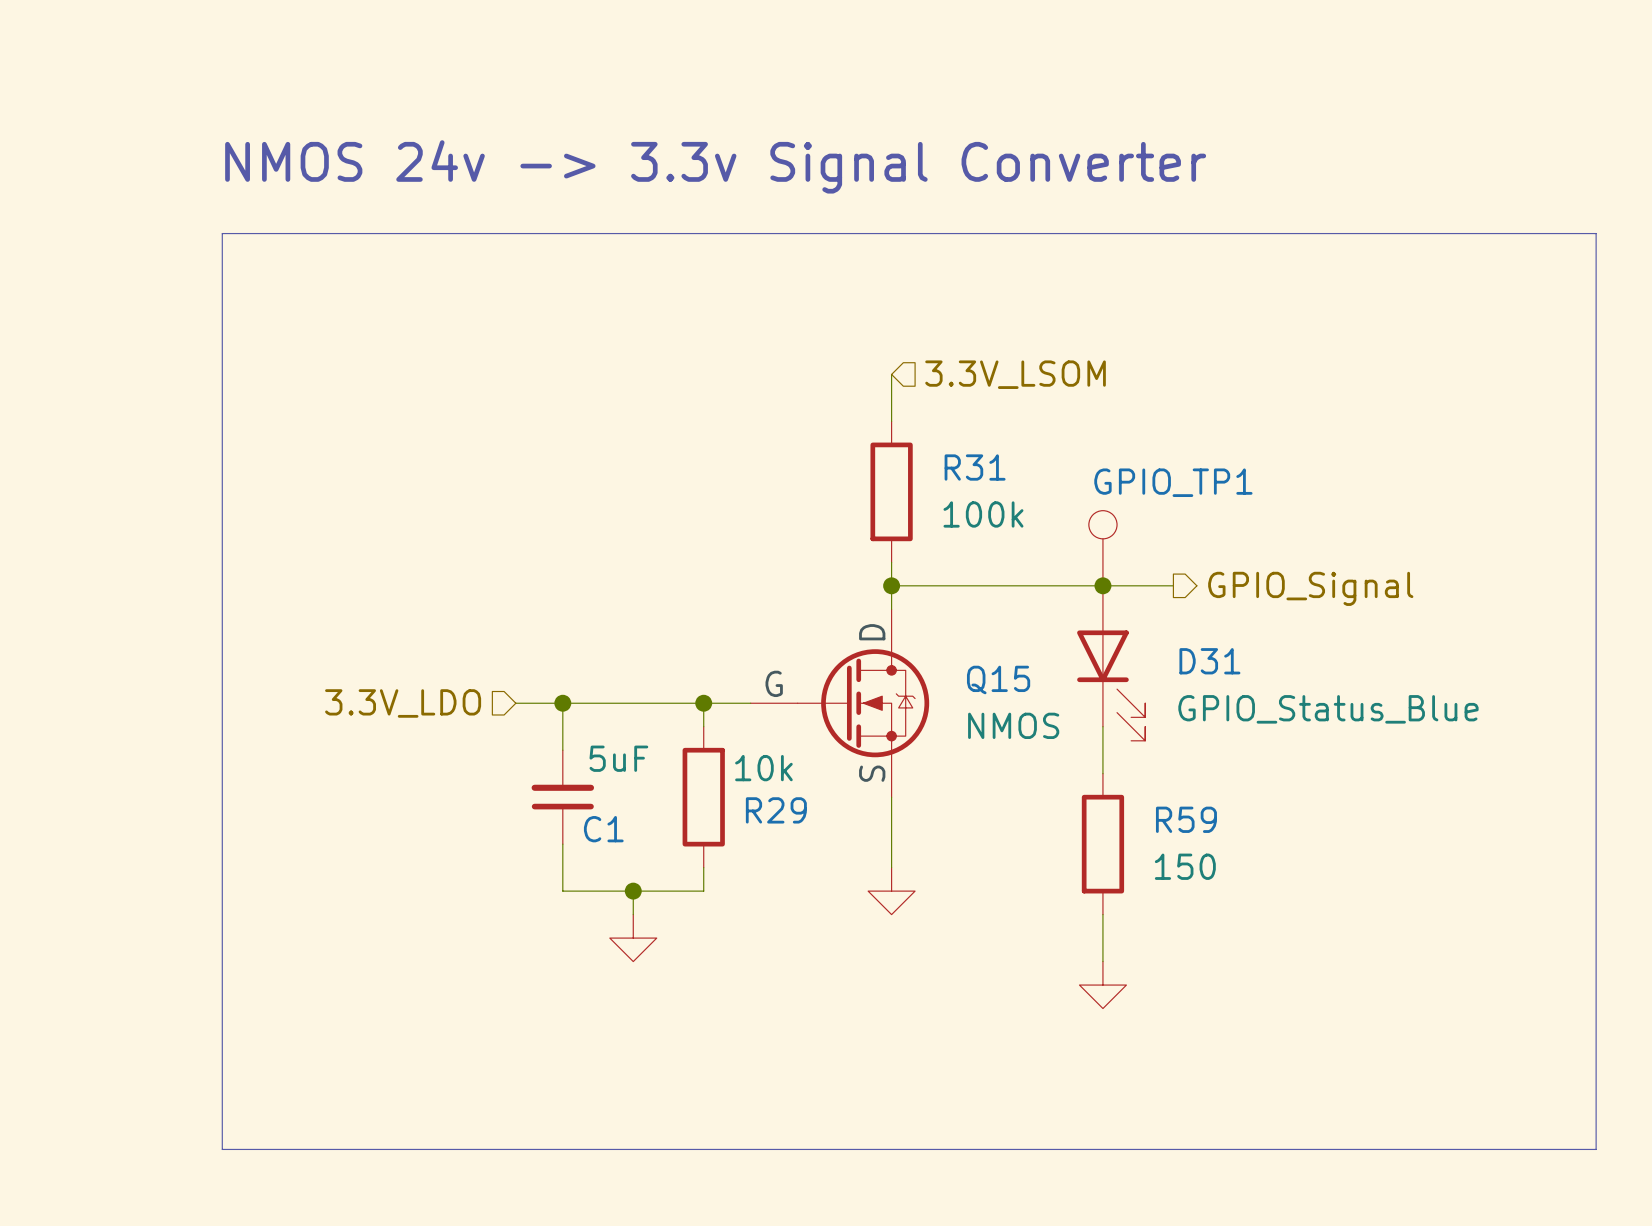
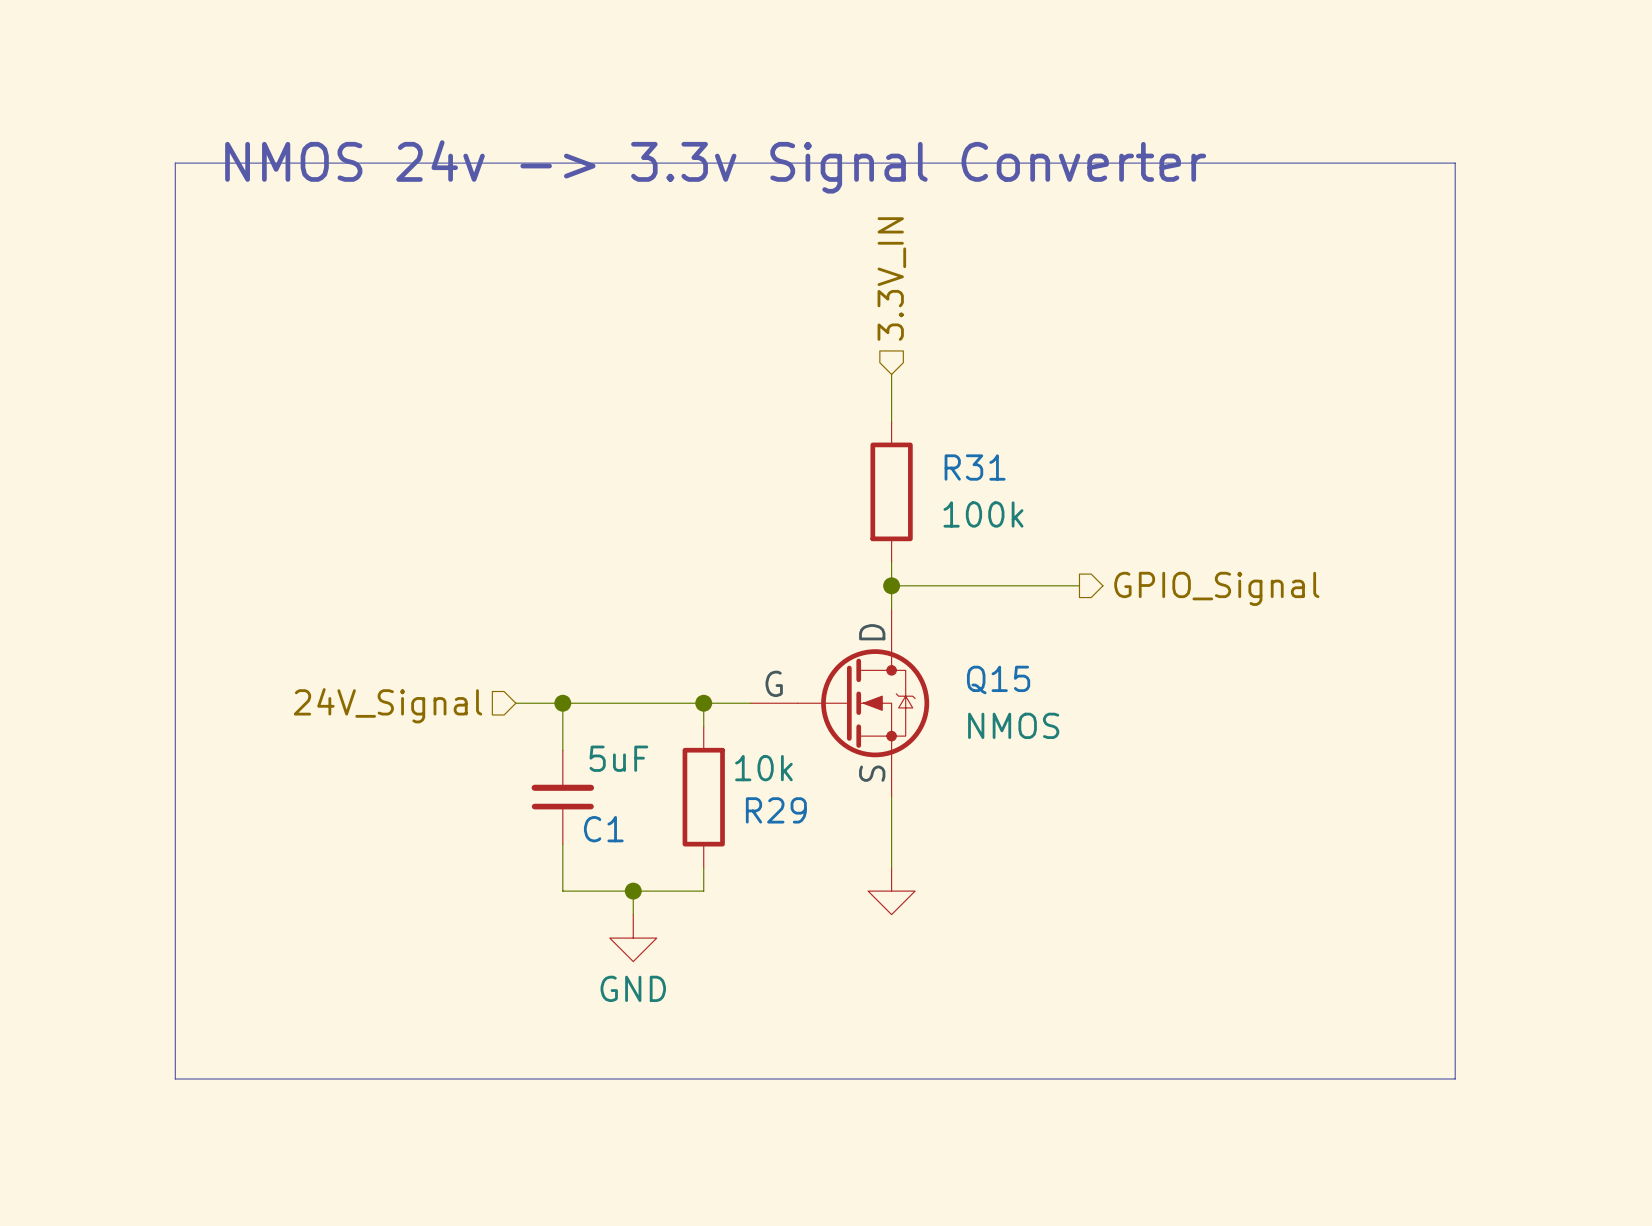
line: (222, 233) (1596, 233) (1596, 1149) (222, 1149) (222, 233) -> (175, 163) (175, 1078) (1455, 1078) (1455, 163) (175, 163)
hierarchical label: none -> 3.3V_IN (891, 279)
hierarchical label: 3.3V_LSOM (1015, 374) -> none
GPIO_TP1: (1102, 548) -> none
wire: (1079, 585) (1173, 585) -> none
junction: (1102, 585) -> none
hierarchical label position: GPIO_Signal (1310, 588) -> GPIO_Signal (1216, 588)
D31: GPIO_Status_Blue (1111, 663) -> none
hierarchical label: 3.3V_LDO (403, 703) -> 24V_Signal (387, 705)
wire: (1102, 726) (1102, 773) -> none
R59: 150 (1102, 844) -> none
wire: (1102, 914) (1102, 961) -> none
power symbol: (1102, 985) -> none
power symbol text: none -> GND (633, 988)

